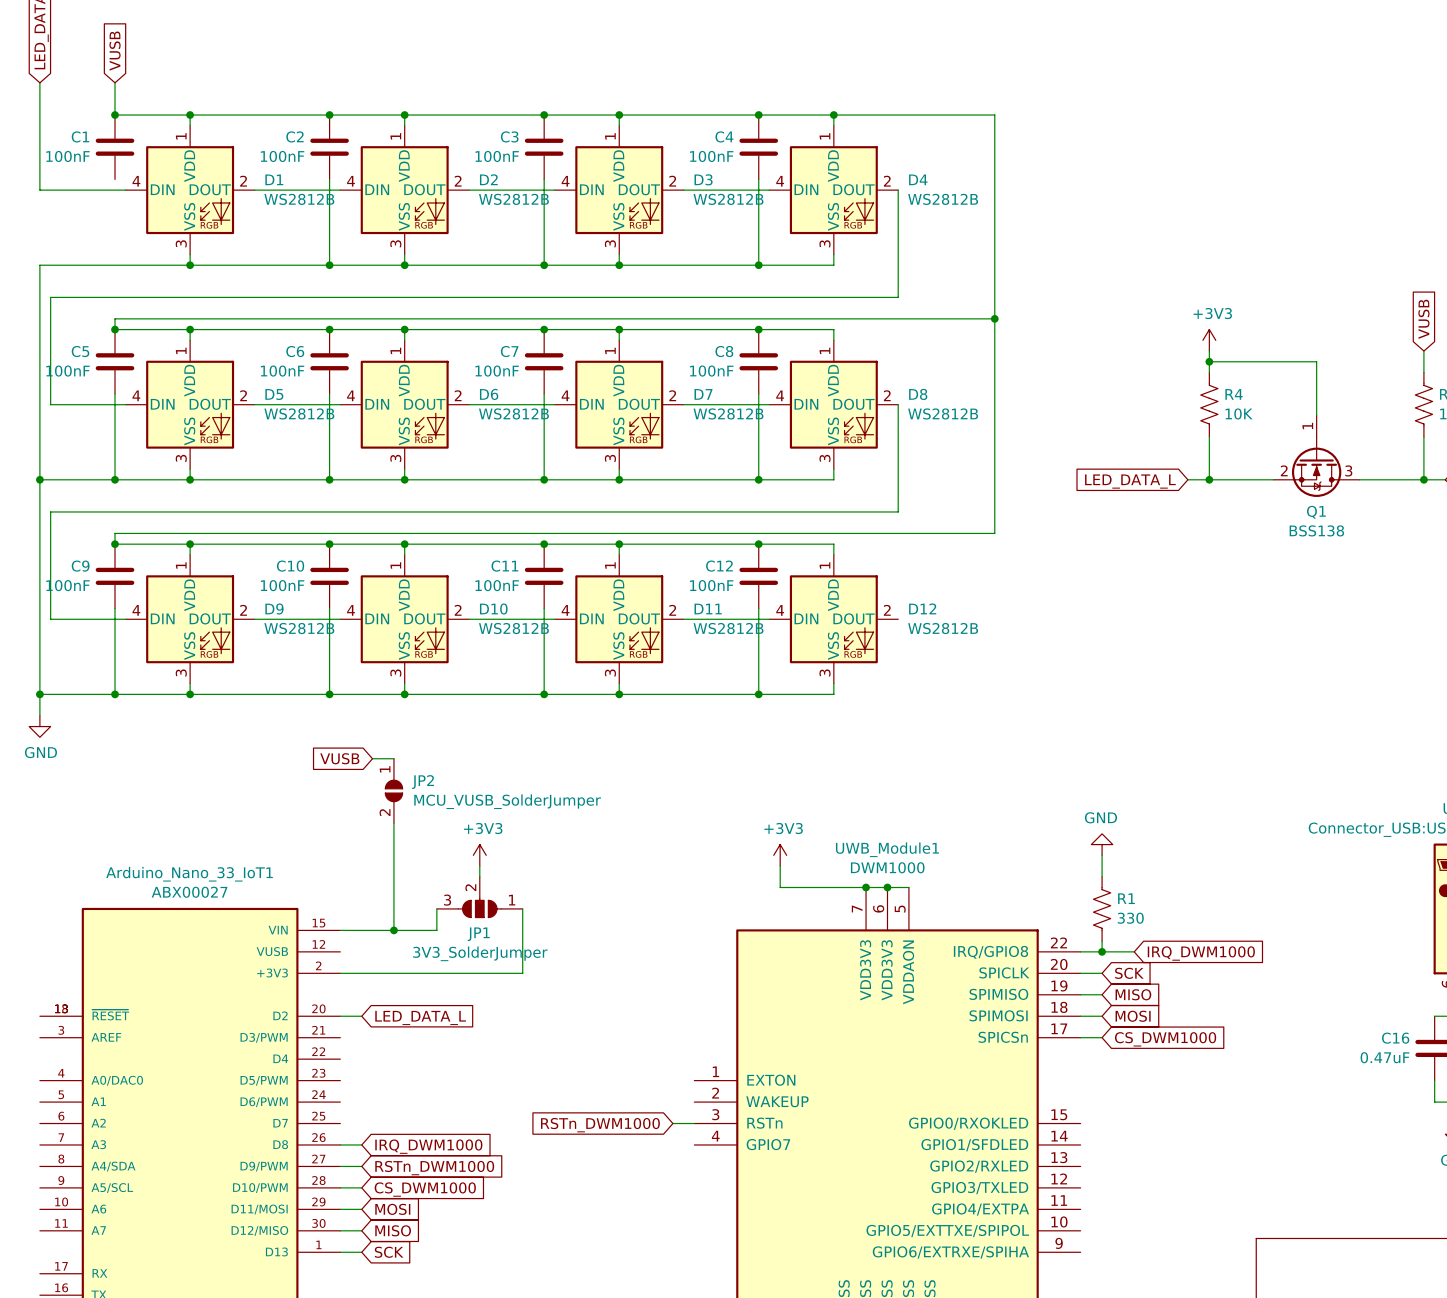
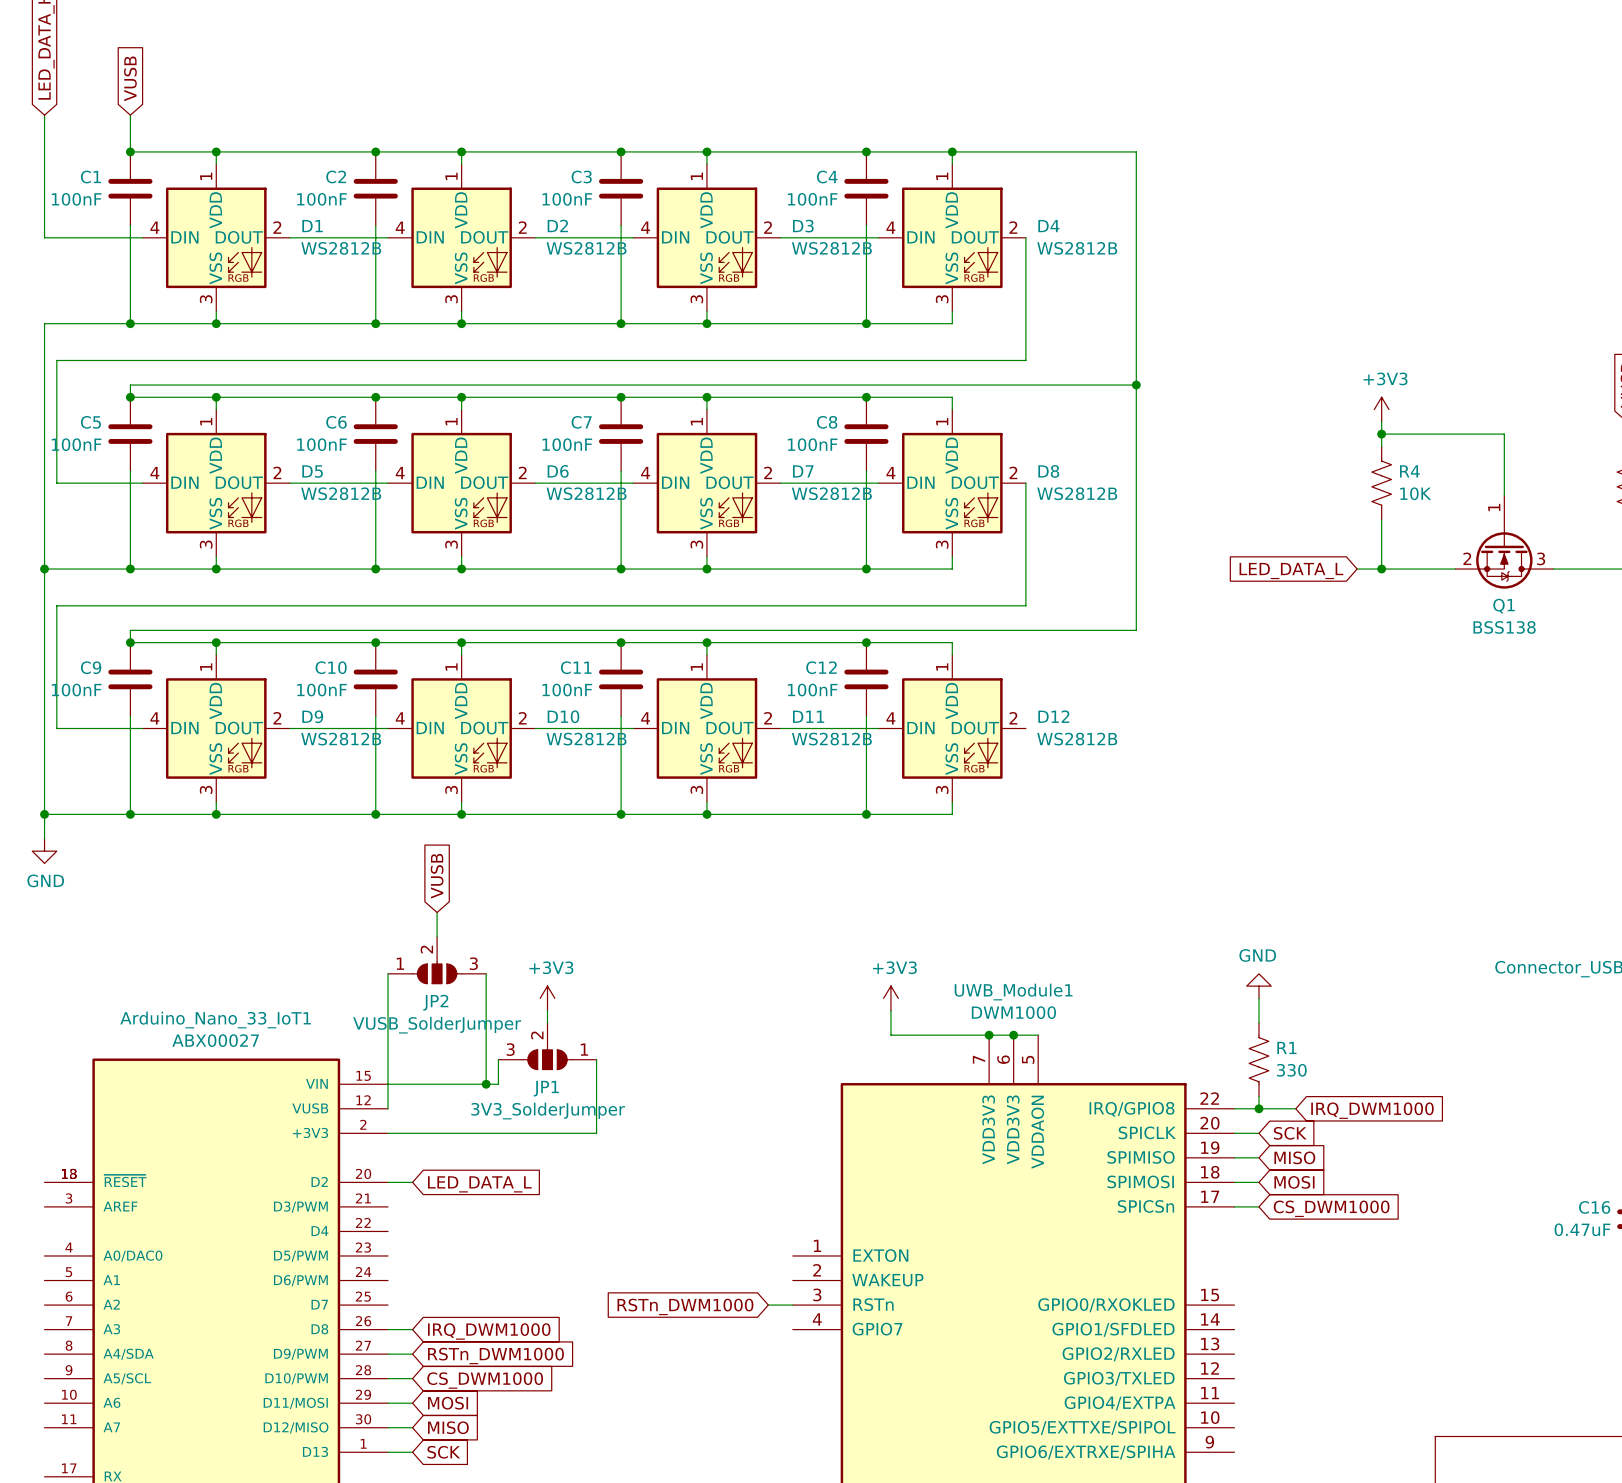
wire: none -> (130, 225) (130, 323)
junction: none -> (130, 323)
global label rotation: 0° (339, 758) -> 90° clockwise (437, 876)
wire: (372, 758) (393, 758) -> none
JP2 symbol: [385, 758, 403, 824] -> [388, 937, 487, 984]
wire: none -> (437, 912) (437, 937)
JP2 name position: JP2 (423, 782) -> JP2 (435, 1002)
JP2 value: MCU_VUSB_SolderJumper (507, 801) -> VUSB_SolderJumper (437, 1025)
wire: (393, 823) (393, 930) -> none
wire: none -> (388, 973) (388, 1108)
wire: none -> (486, 973) (486, 1084)
junction position: (393, 930) -> (486, 1084)

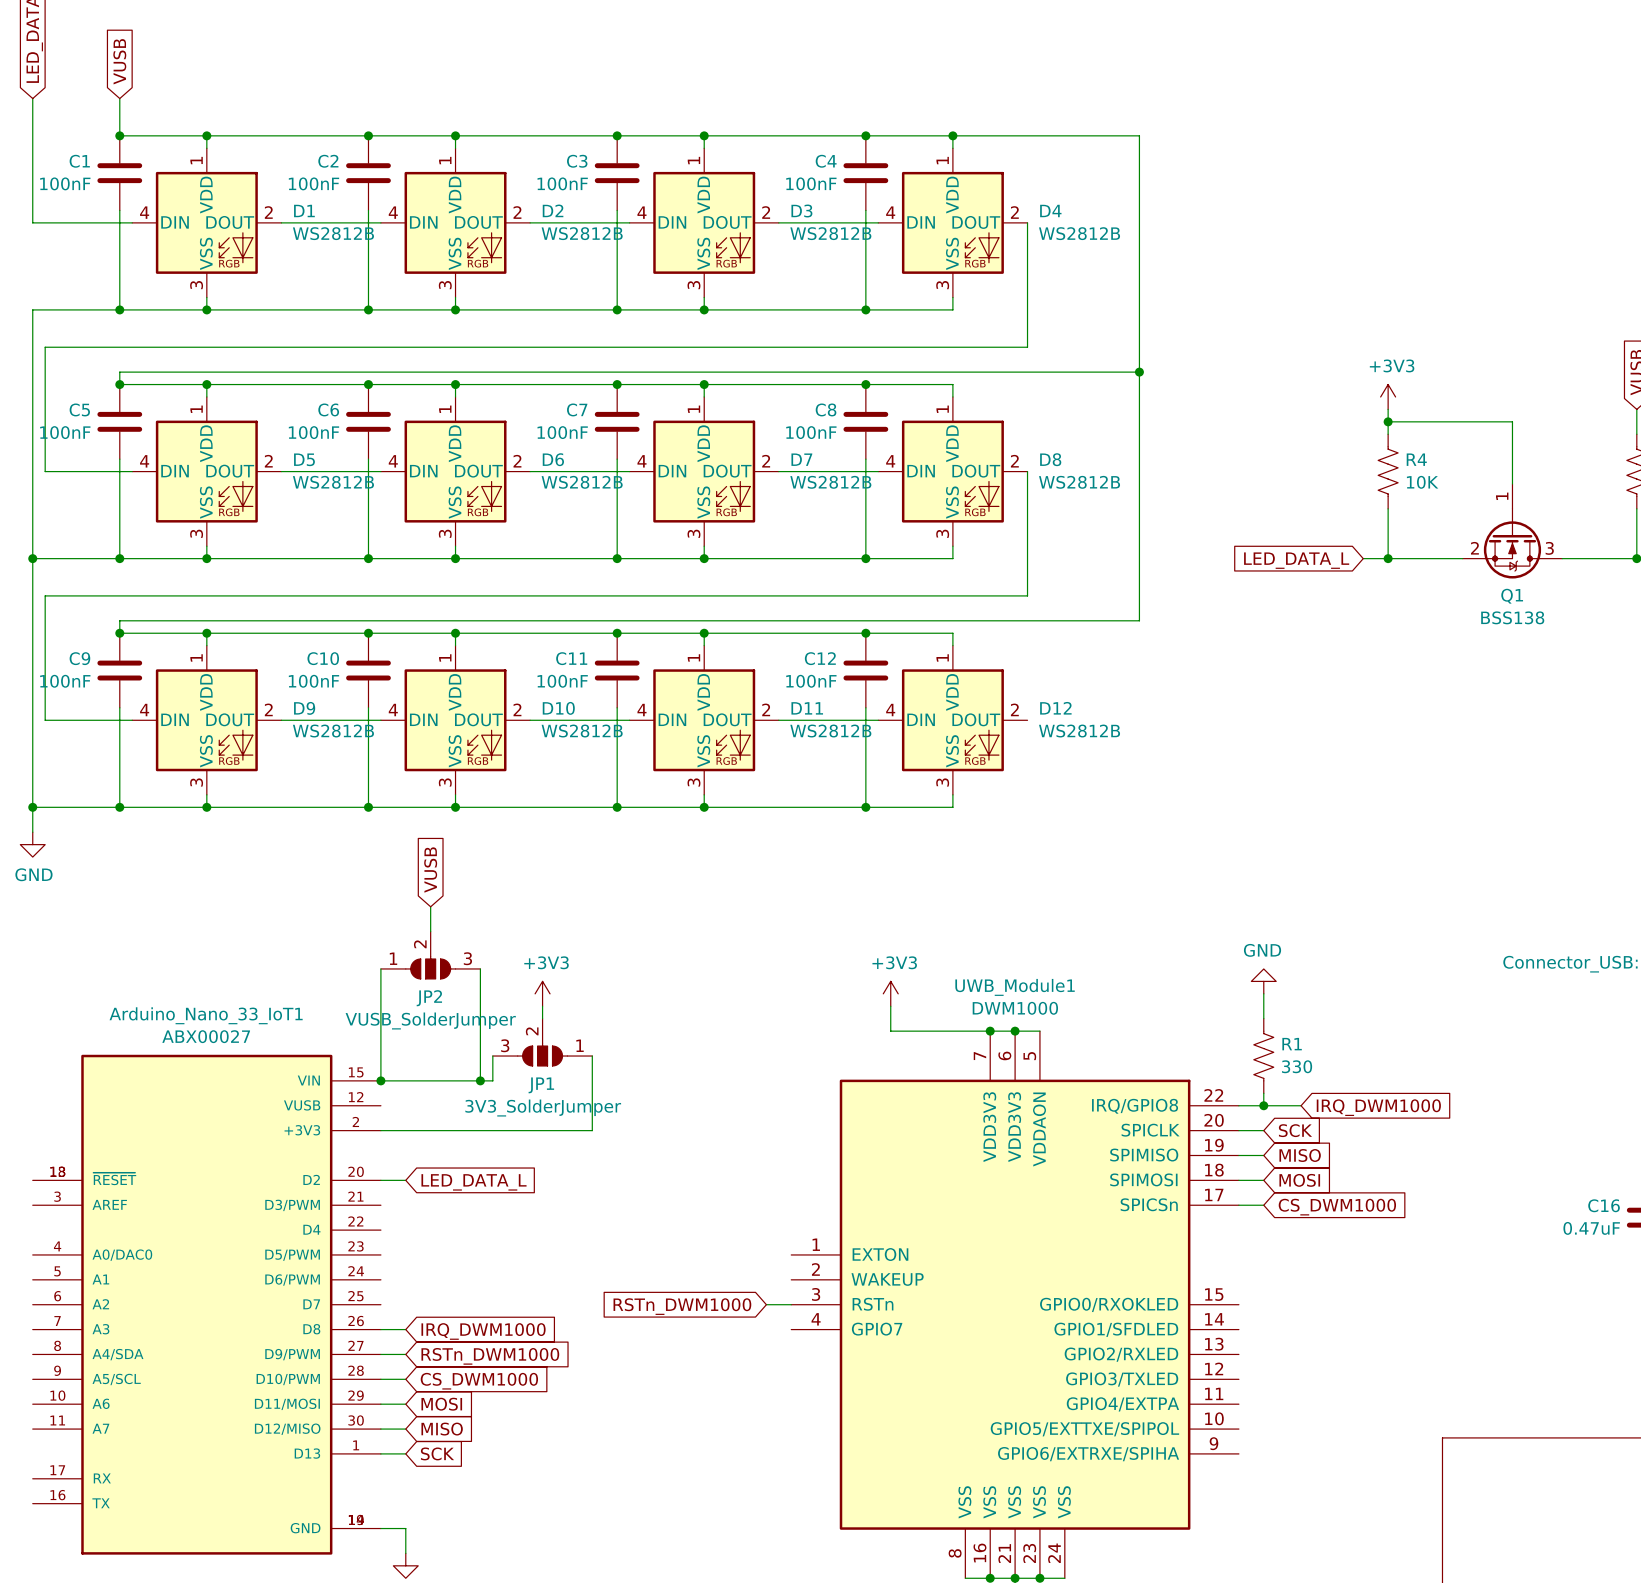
wire: (388, 1084) (388, 1108) -> none
junction: none -> (380, 1080)

